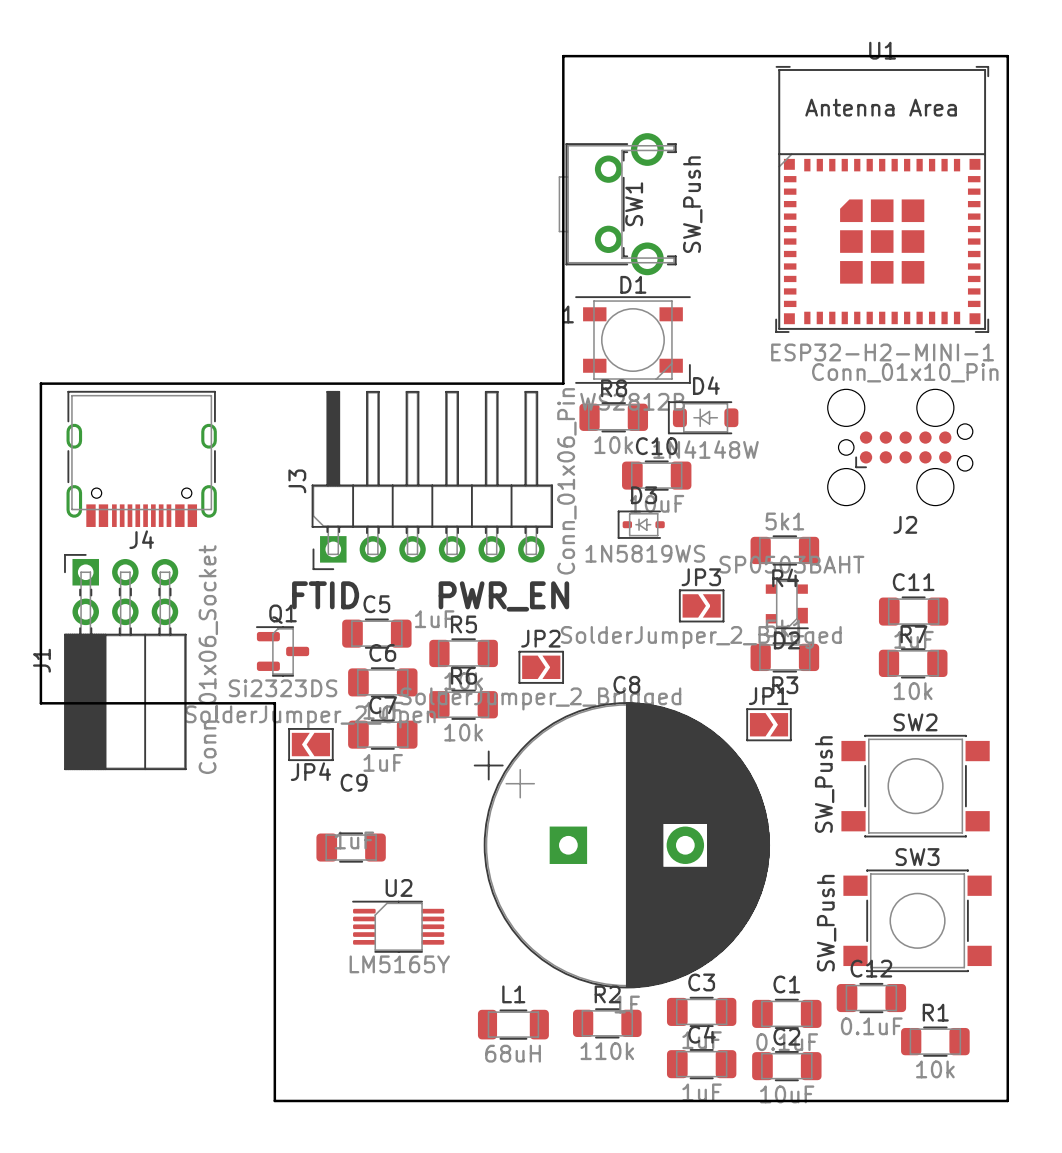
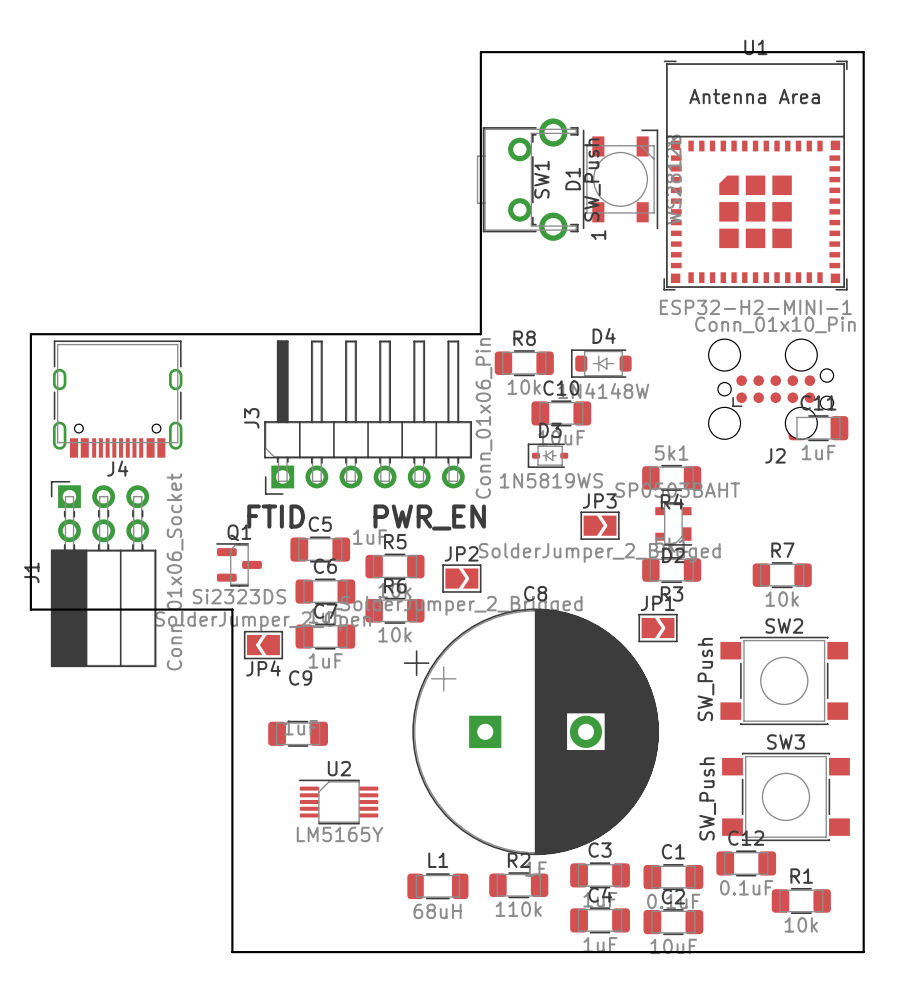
D1 rotation: 0° (632, 340) -> 90° counterclockwise (620, 179)
D1 position: (632, 340) -> (620, 179)
C11 position: (913, 611) -> (818, 428)

